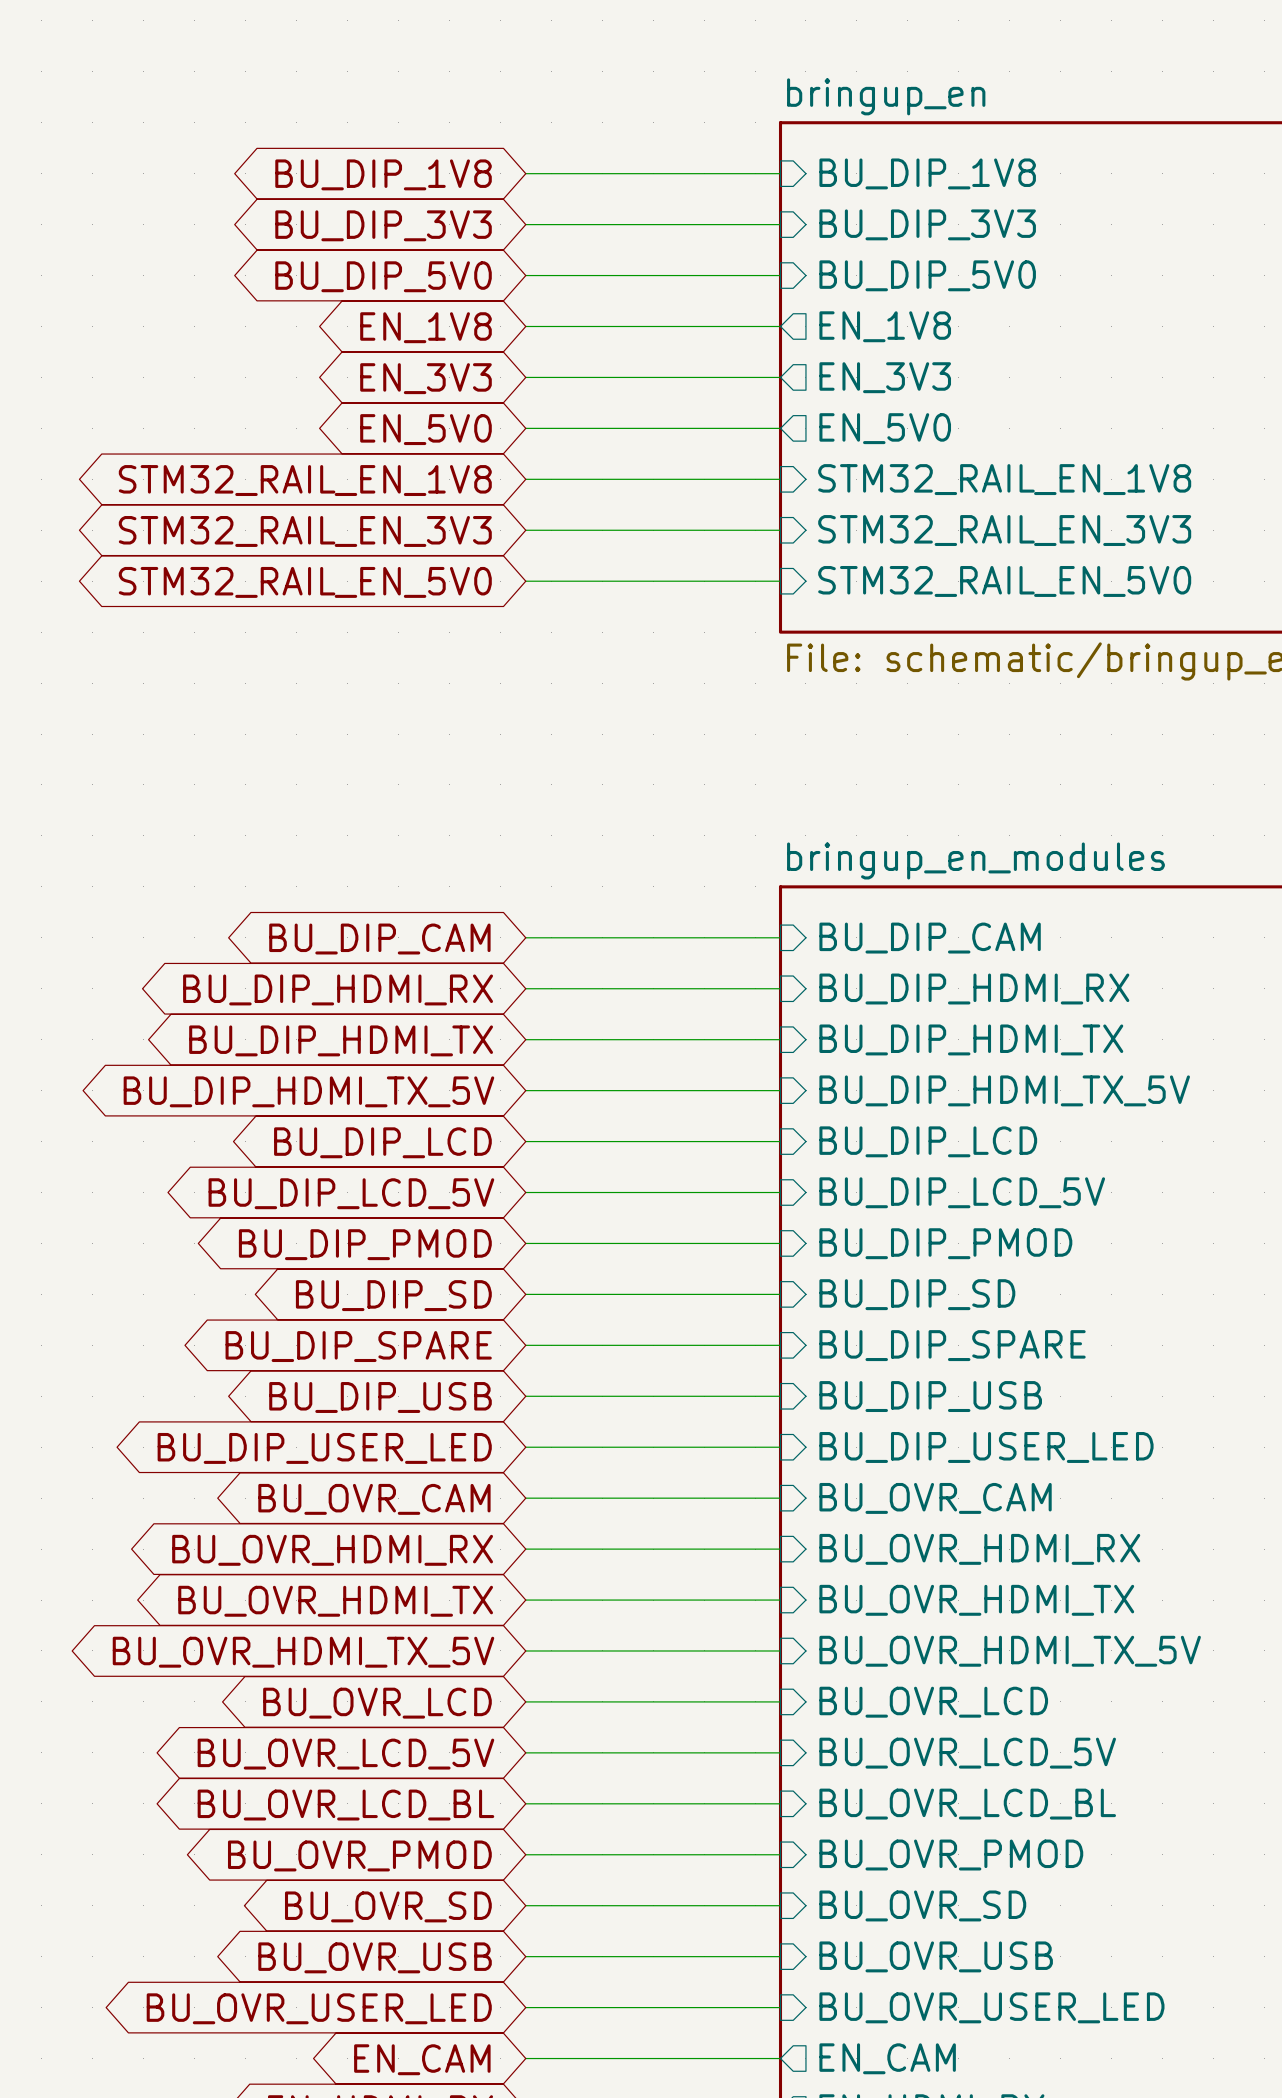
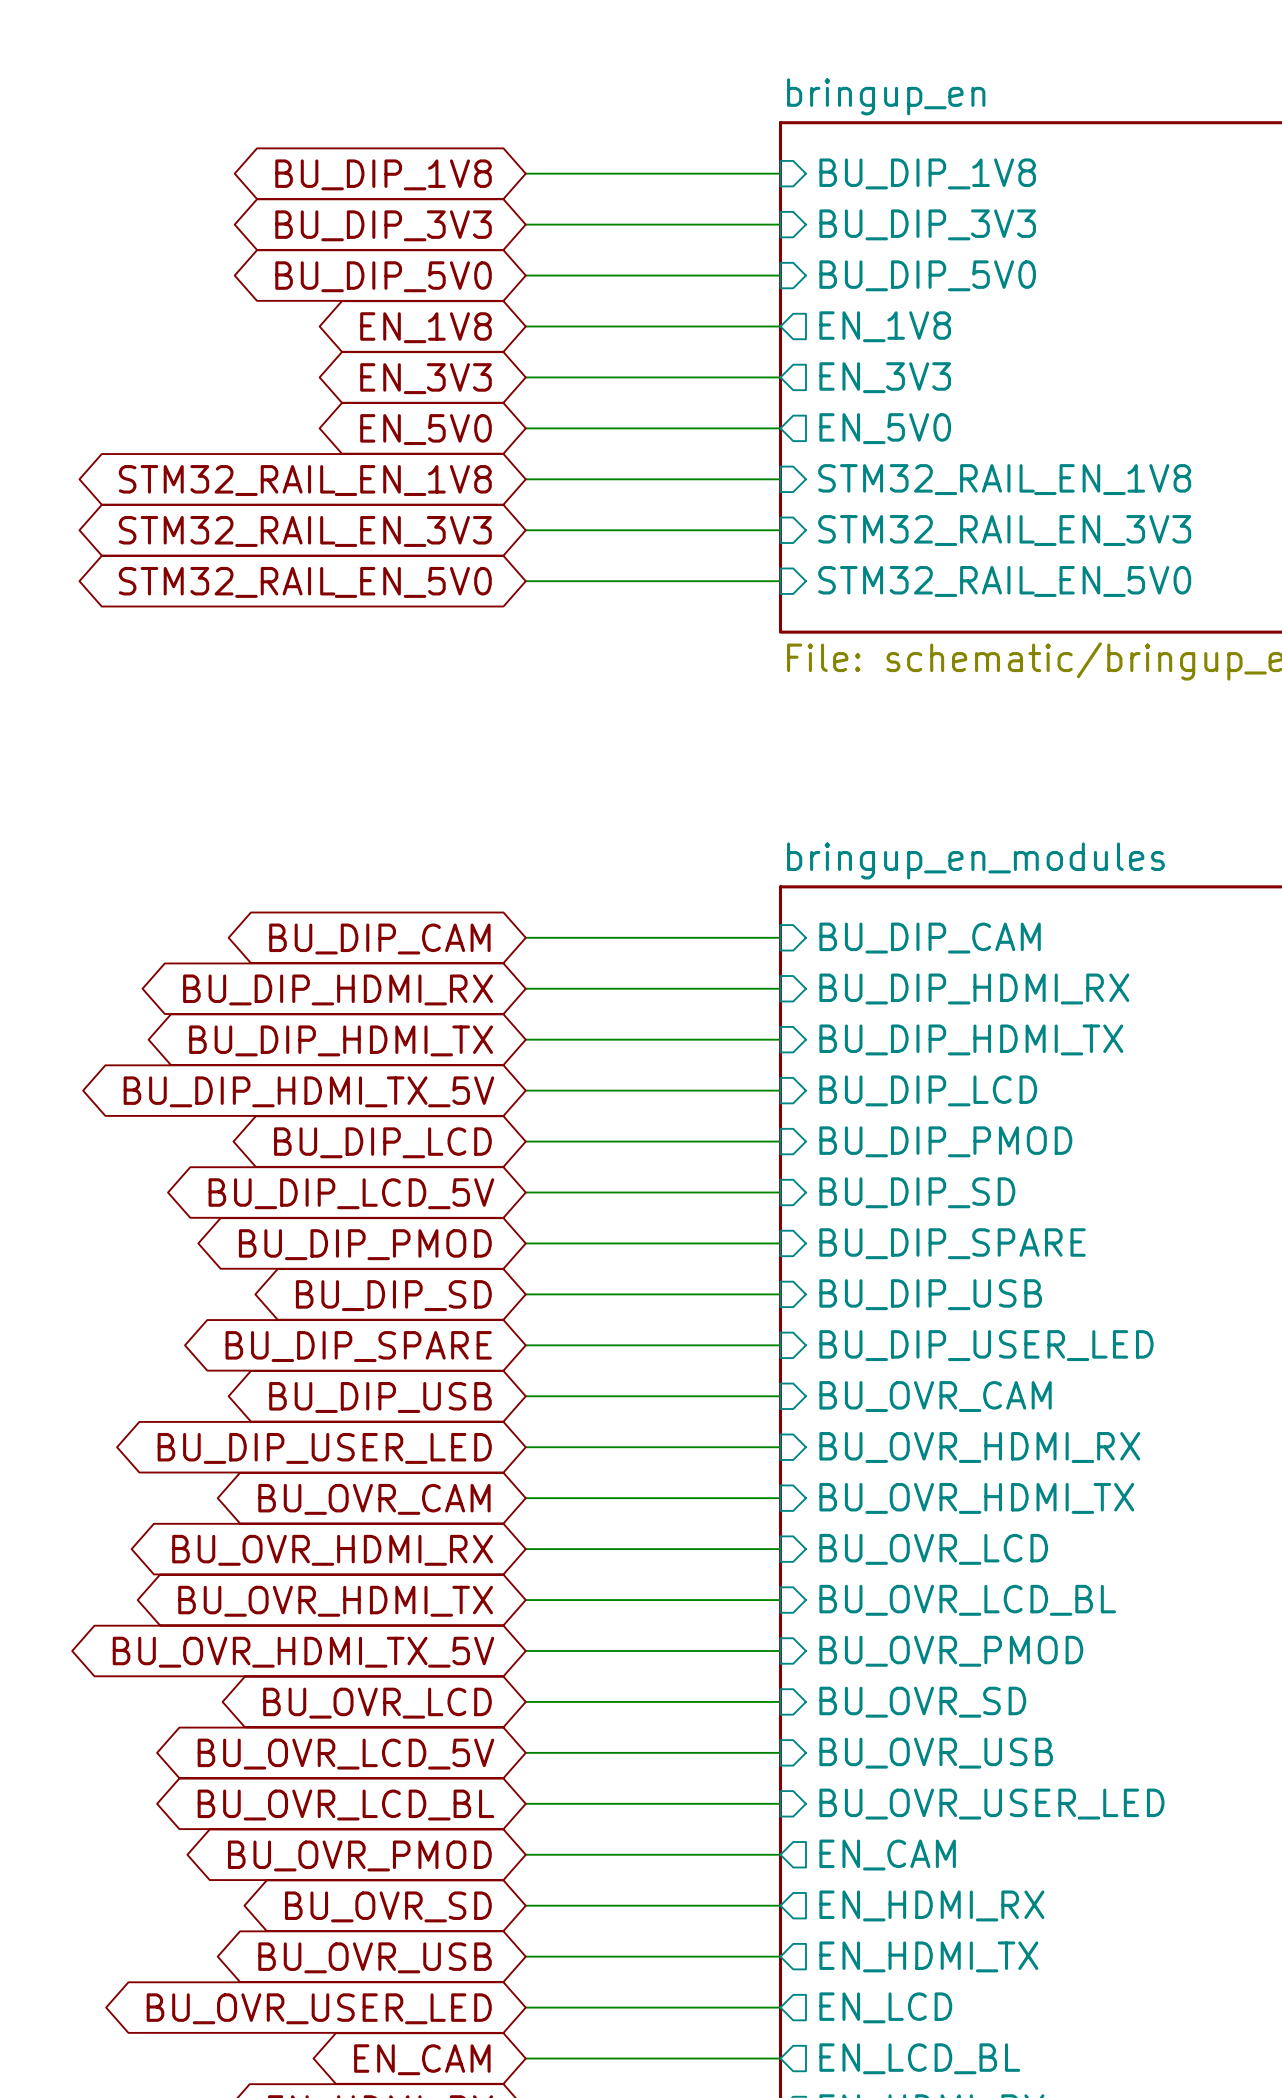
sheet pin: BU_DIP_HDMI_TX_5V (1004, 1090) -> BU_DIP_LCD (928, 1090)
sheet pin: BU_DIP_LCD (928, 1141) -> BU_DIP_PMOD (945, 1141)
sheet pin: BU_DIP_LCD_5V (962, 1192) -> BU_DIP_SD (917, 1192)
sheet pin: BU_DIP_PMOD (945, 1243) -> BU_DIP_SPARE (952, 1243)
sheet pin: BU_DIP_SD (917, 1294) -> BU_DIP_USB (930, 1294)
sheet pin: BU_DIP_SPARE (952, 1345) -> BU_DIP_USER_LED (986, 1345)
sheet pin: BU_DIP_USB (930, 1396) -> BU_OVR_CAM (935, 1396)
sheet pin: BU_DIP_USER_LED (986, 1447) -> BU_OVR_HDMI_RX (979, 1447)
sheet pin: BU_OVR_CAM (935, 1498) -> BU_OVR_HDMI_TX (976, 1498)
sheet pin: BU_OVR_HDMI_RX (979, 1549) -> BU_OVR_LCD (933, 1549)
sheet pin: BU_OVR_HDMI_TX (976, 1600) -> BU_OVR_LCD_BL (967, 1600)
sheet pin: BU_OVR_HDMI_TX_5V (1010, 1651) -> BU_OVR_PMOD (951, 1651)
sheet pin: BU_OVR_LCD (933, 1702) -> BU_OVR_SD (922, 1702)
sheet pin: BU_OVR_LCD_5V (967, 1753) -> BU_OVR_USB (936, 1753)
sheet pin: BU_OVR_LCD_BL (967, 1804) -> BU_OVR_USER_LED (991, 1804)
sheet pin shape: input (951, 1855) -> output (887, 1855)
sheet pin: BU_OVR_PMOD (951, 1855) -> EN_CAM (887, 1855)
sheet pin shape: input (922, 1905) -> output (931, 1905)
sheet pin: BU_OVR_SD (922, 1905) -> EN_HDMI_RX (931, 1905)
sheet pin shape: input (936, 1956) -> output (928, 1956)
sheet pin: BU_OVR_USB (936, 1956) -> EN_HDMI_TX (928, 1956)
sheet pin shape: input (991, 2007) -> output (885, 2007)
sheet pin: BU_OVR_USER_LED (991, 2007) -> EN_LCD (885, 2007)
sheet pin: EN_CAM (887, 2058) -> EN_LCD_BL (919, 2058)

